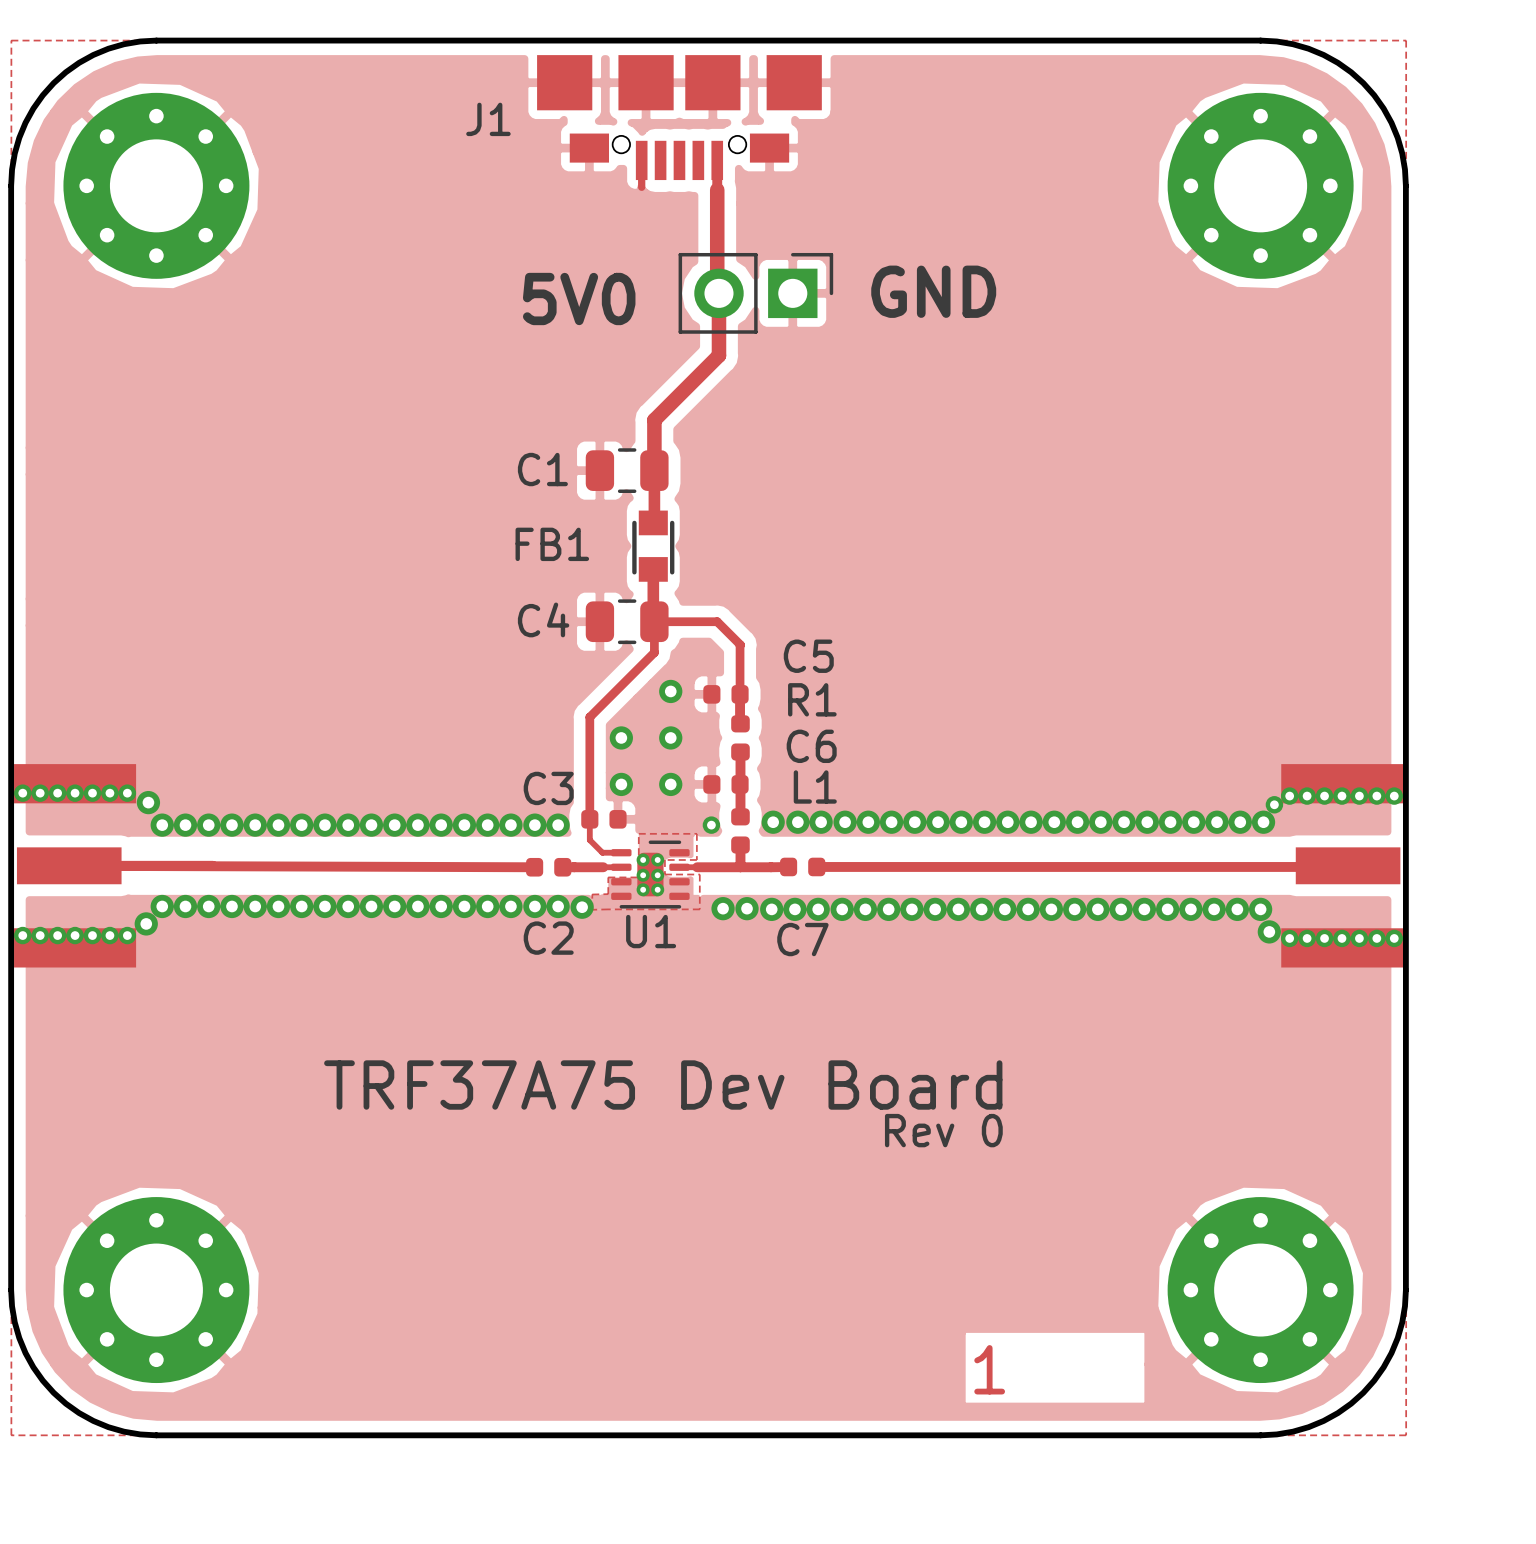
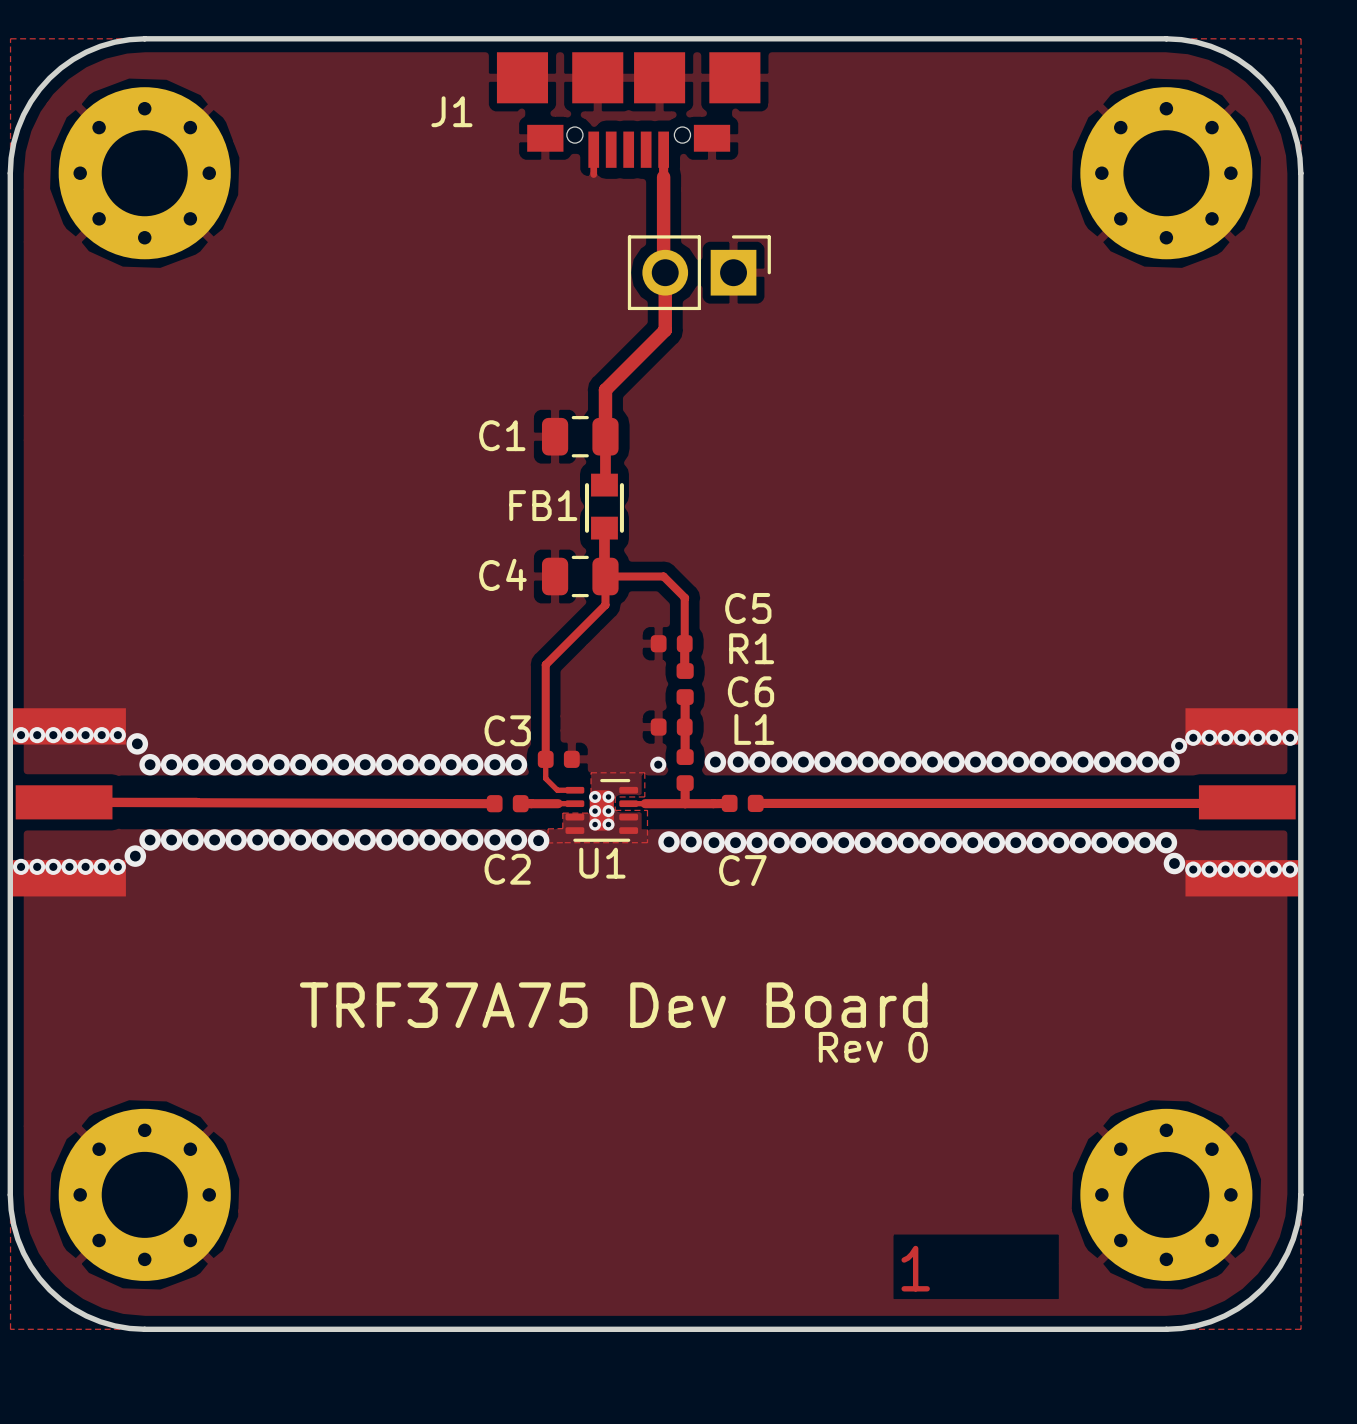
text: GND (933, 291) -> none
text: 5V0 (579, 299) -> none
FB1 name position: FB1 (552, 544) -> FB1 (543, 505)
via: (670, 691) -> none
via: (621, 737) -> none
via: (670, 737) -> none
via: (621, 784) -> none
via: (670, 784) -> none

